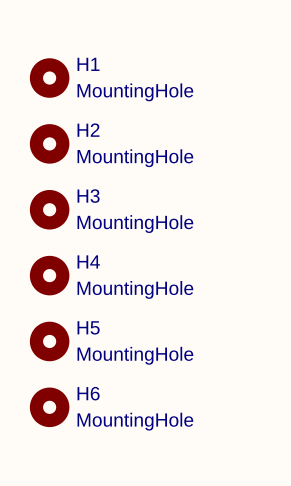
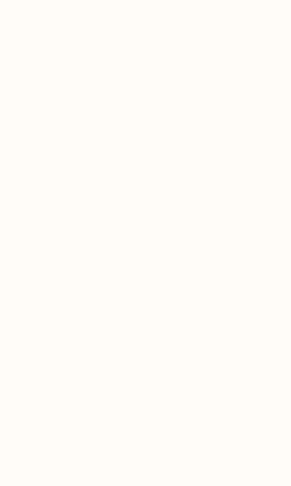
H1: MountingHole (49, 78) -> none
H2: MountingHole (49, 143) -> none
H3: MountingHole (49, 209) -> none
H4: MountingHole (49, 275) -> none
H5: MountingHole (49, 341) -> none
H6: MountingHole (49, 407) -> none

